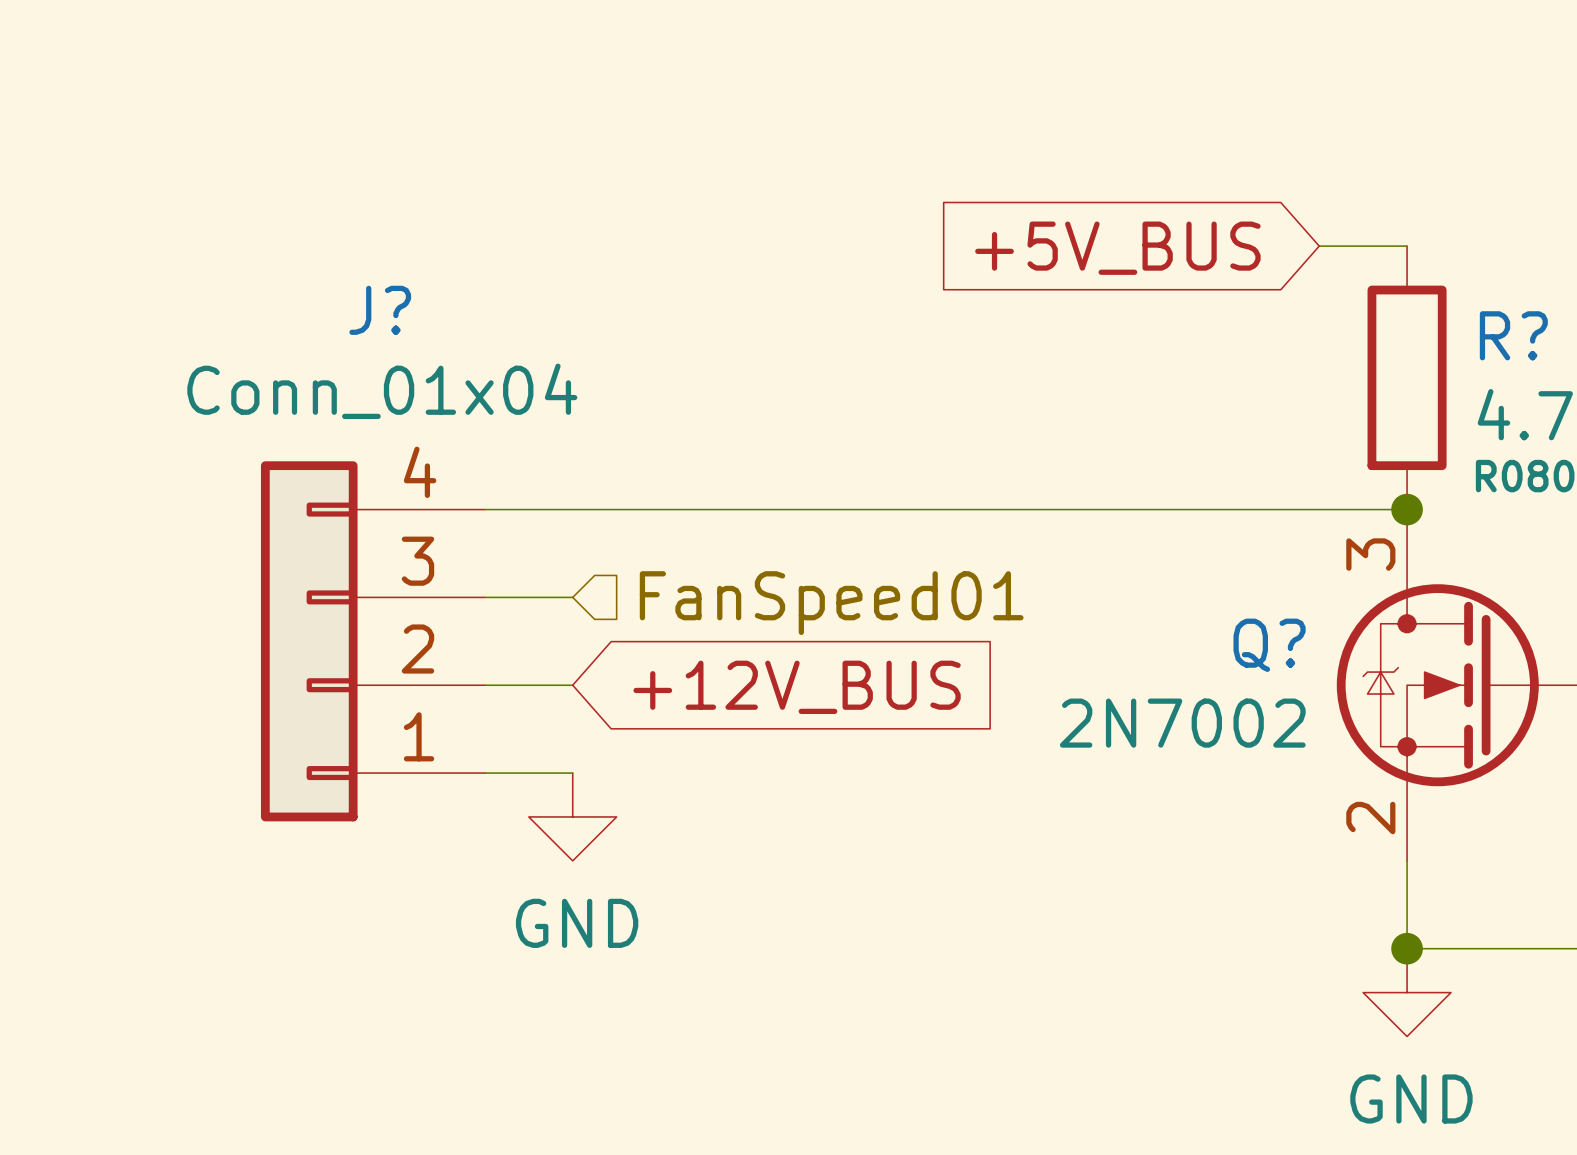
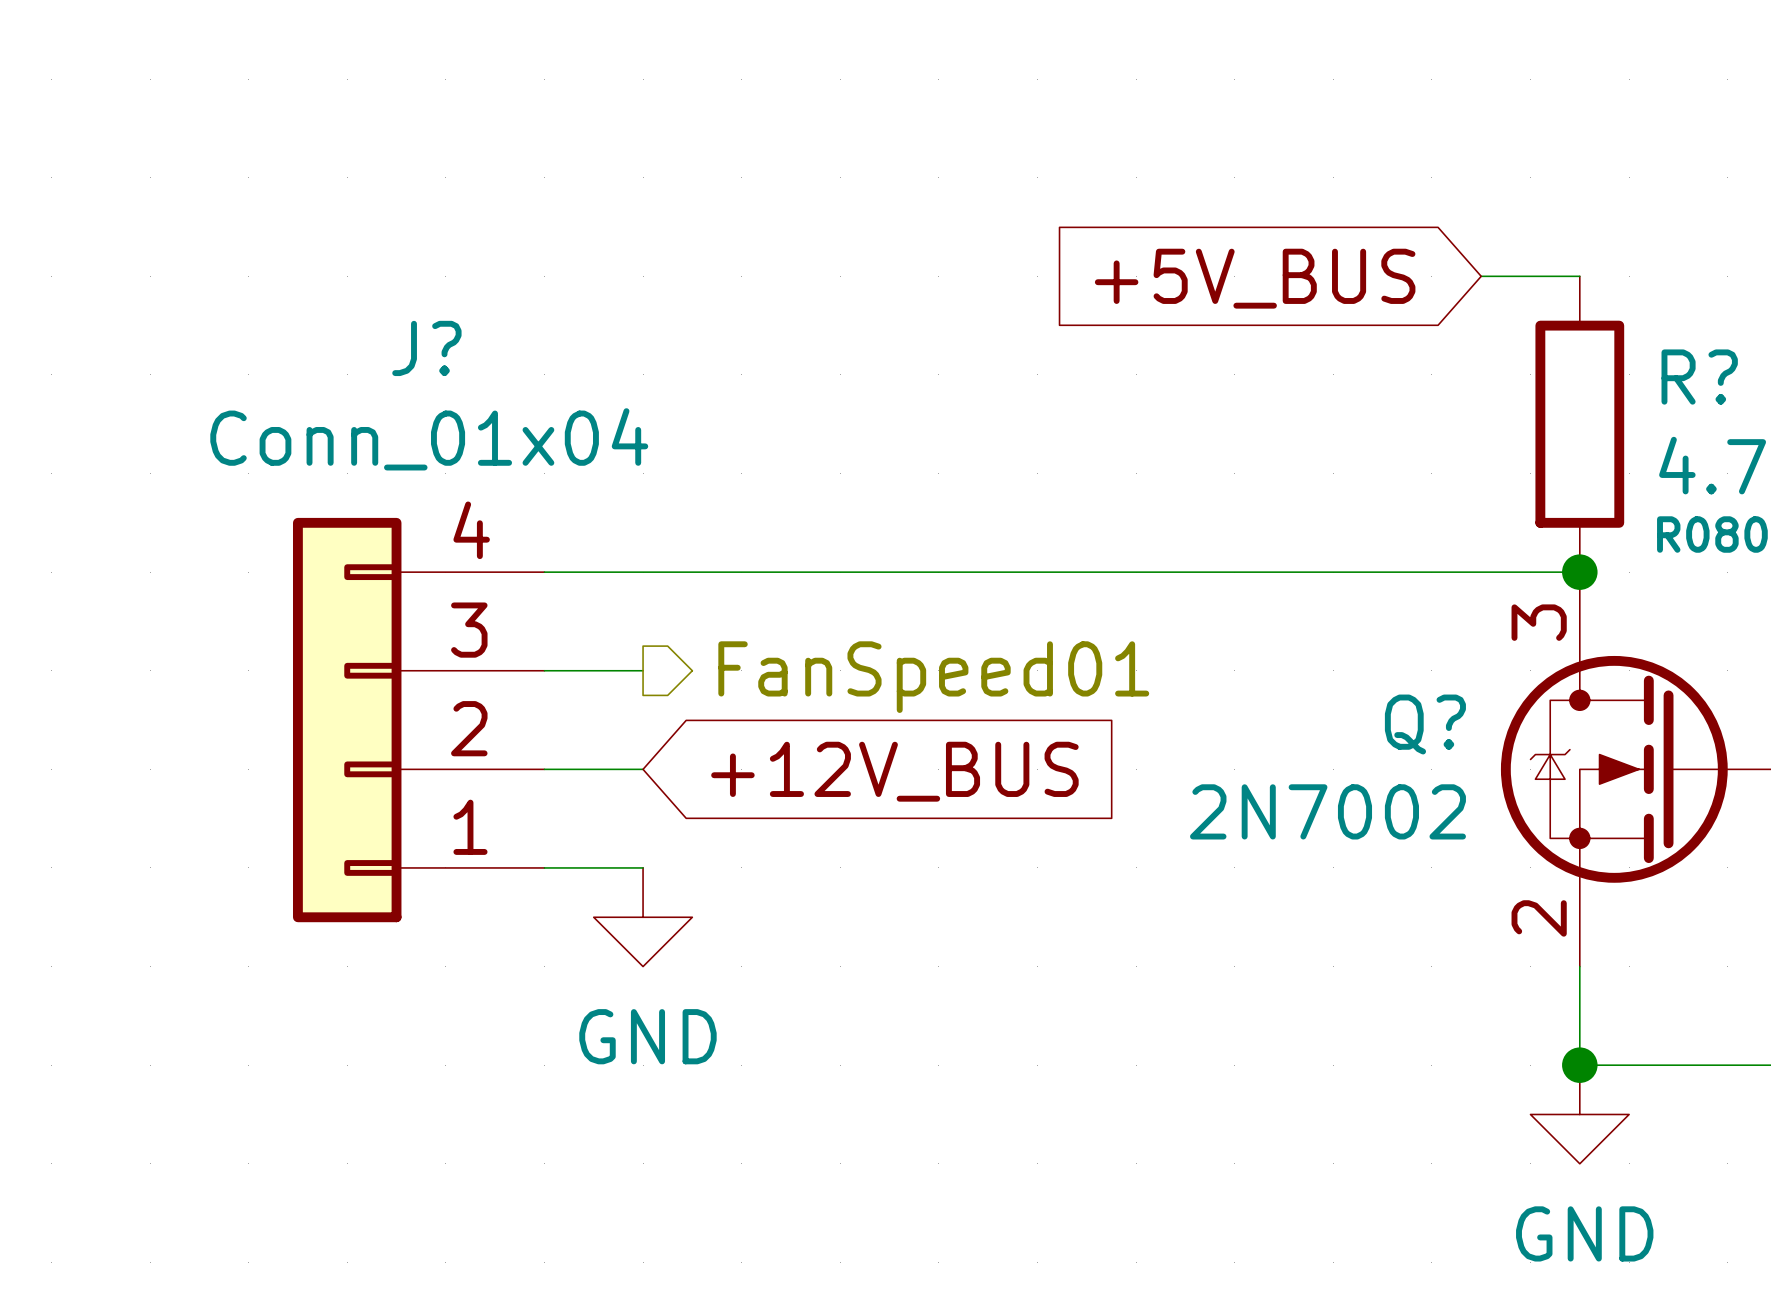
hierarchical label shape: input (831, 603) -> output (933, 677)

